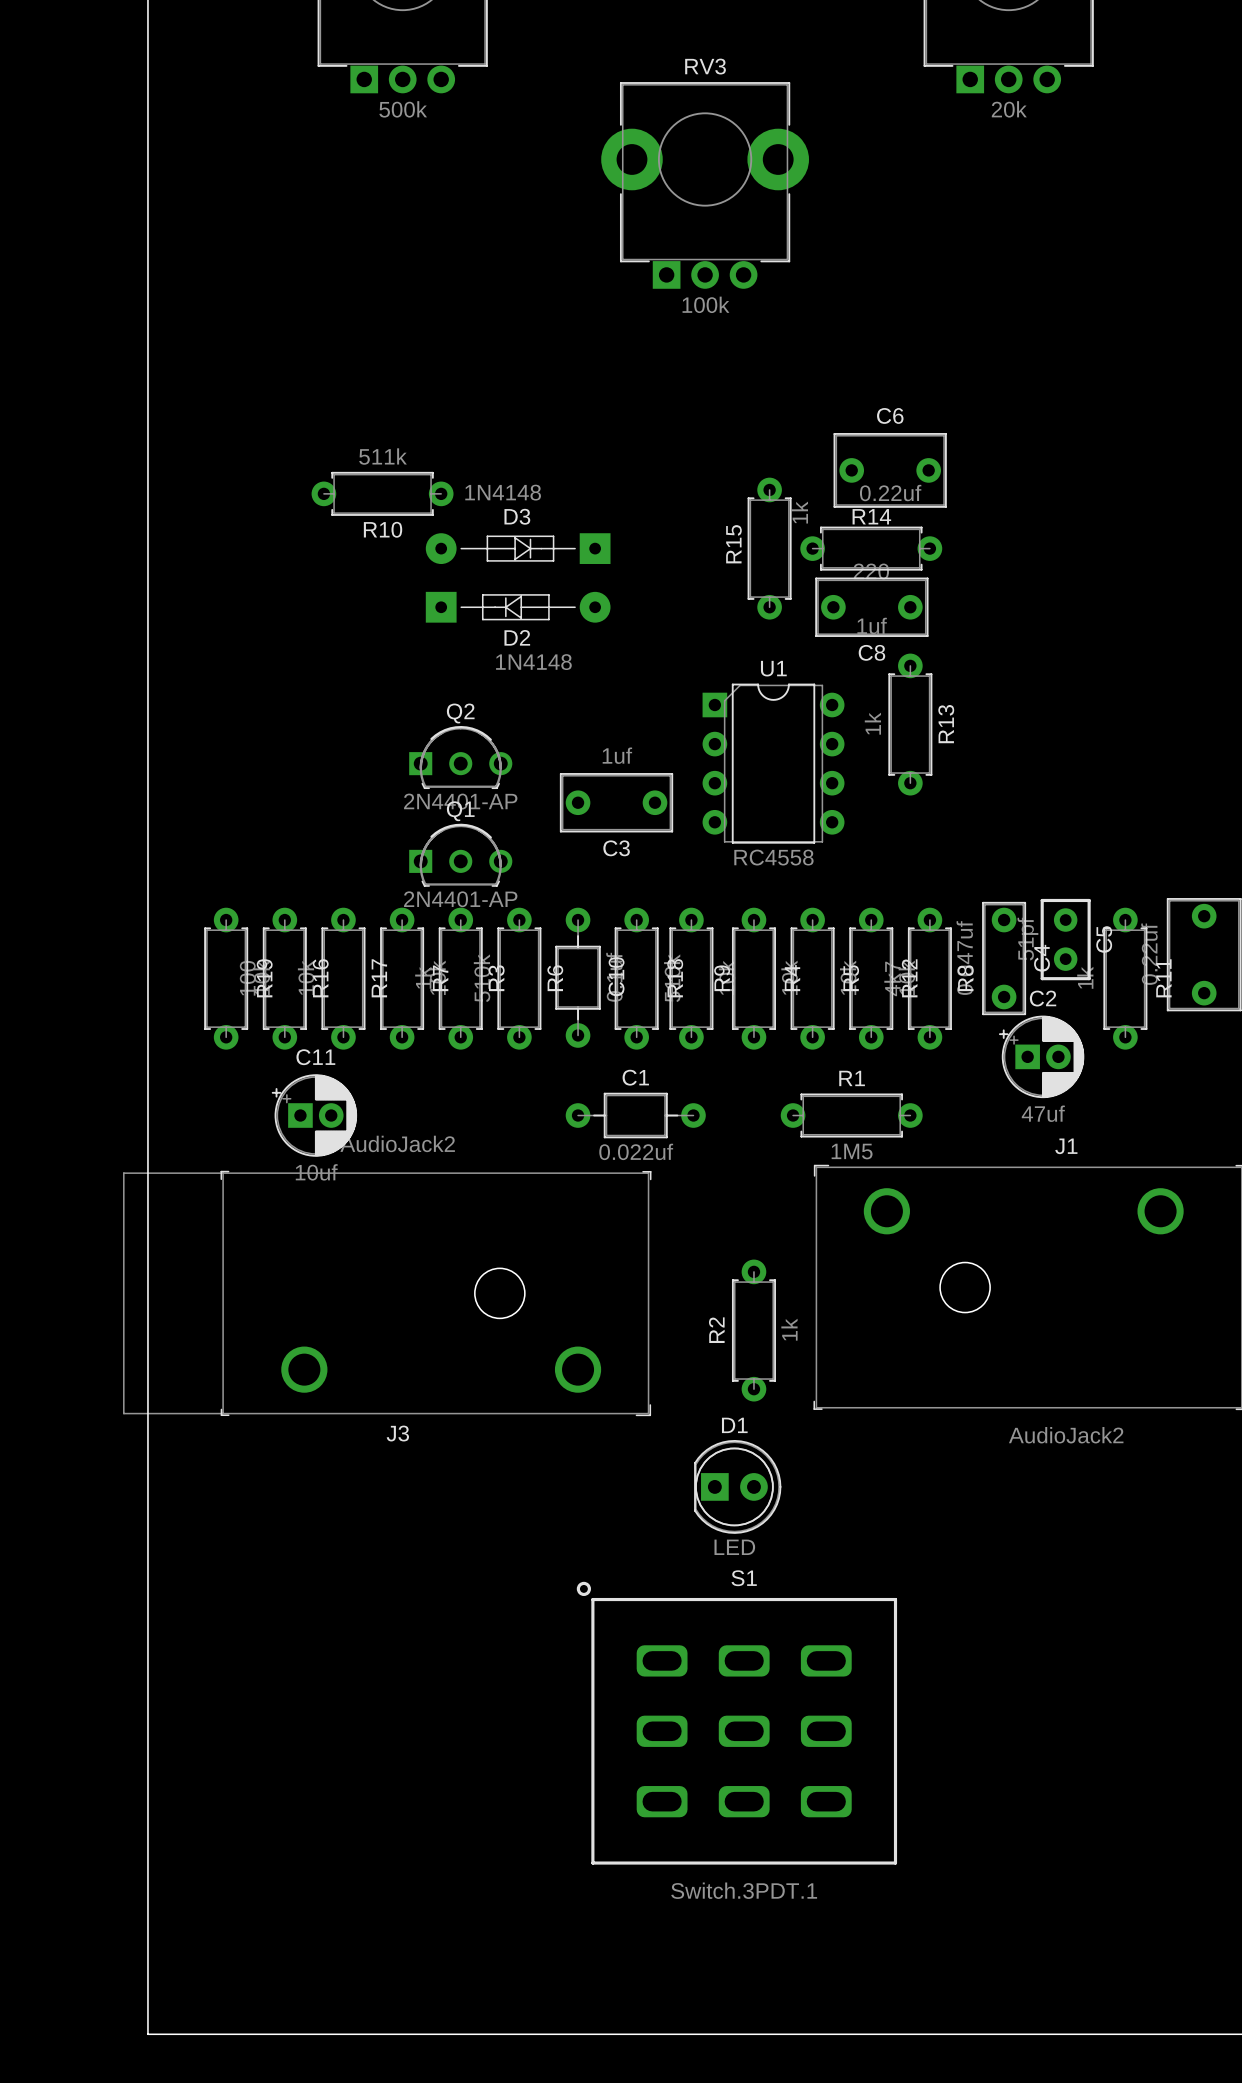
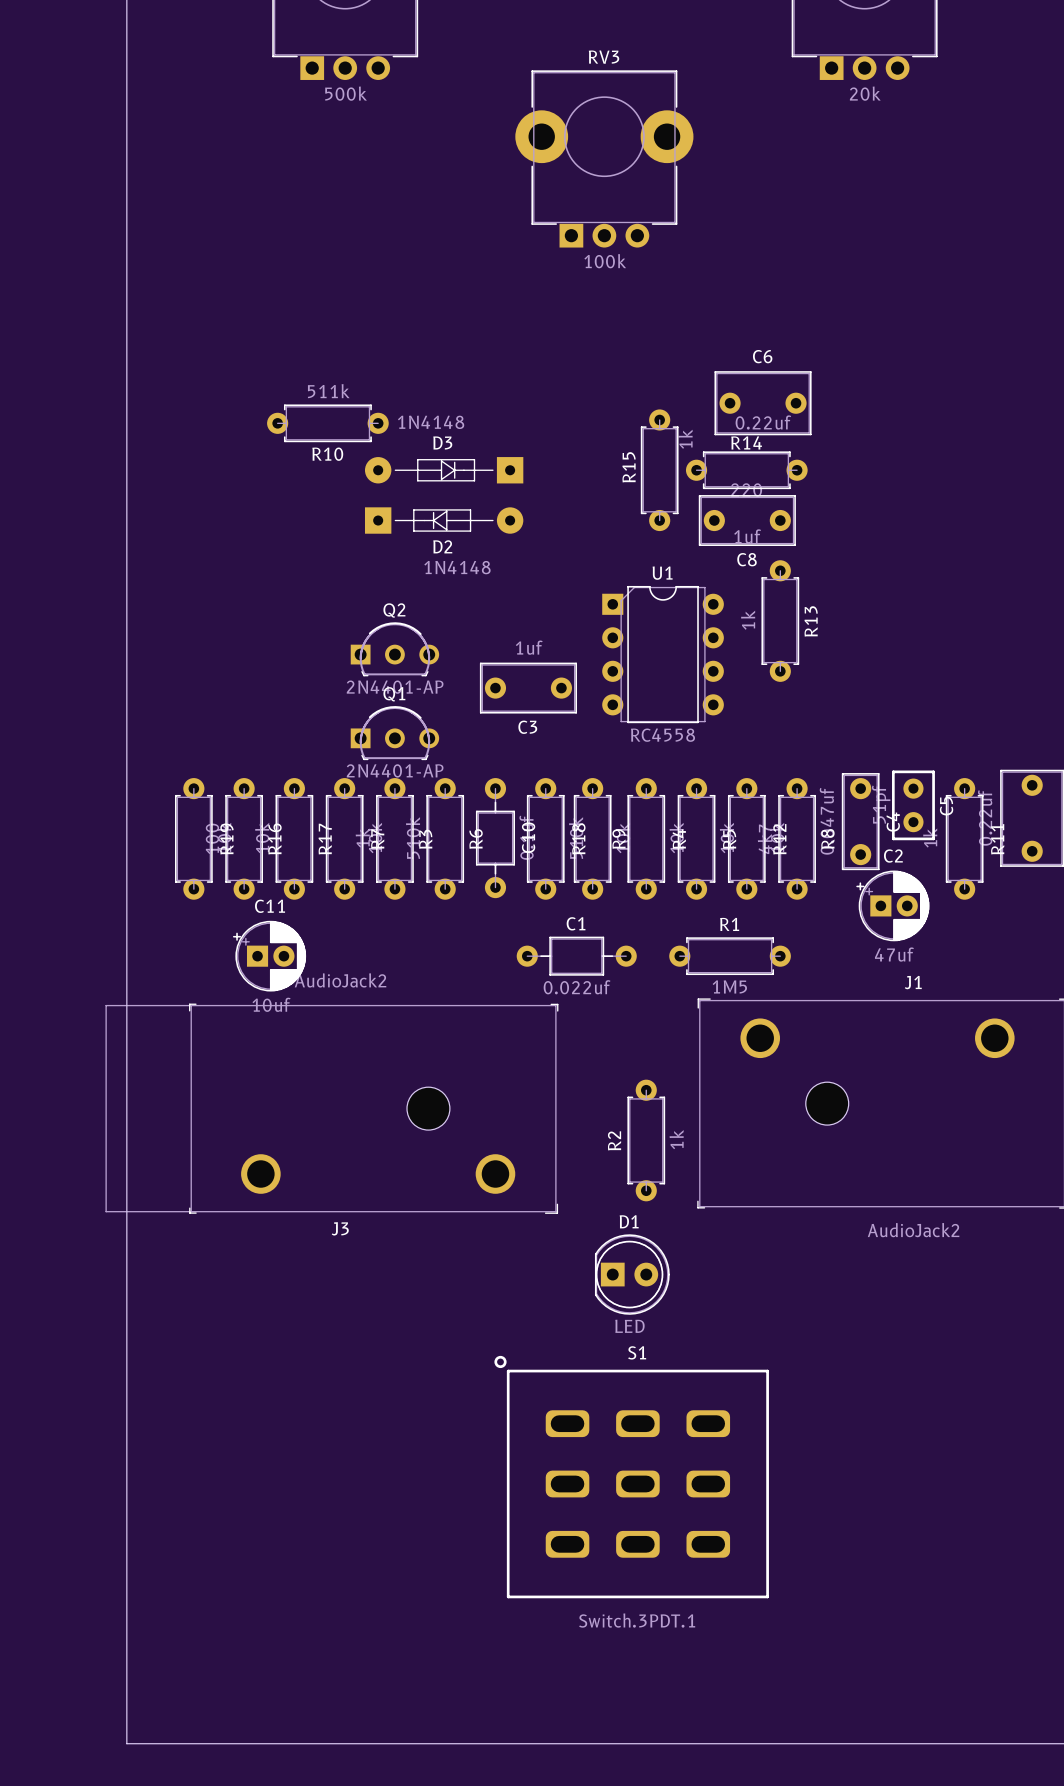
C1 position: (635, 1115) -> (576, 956)

